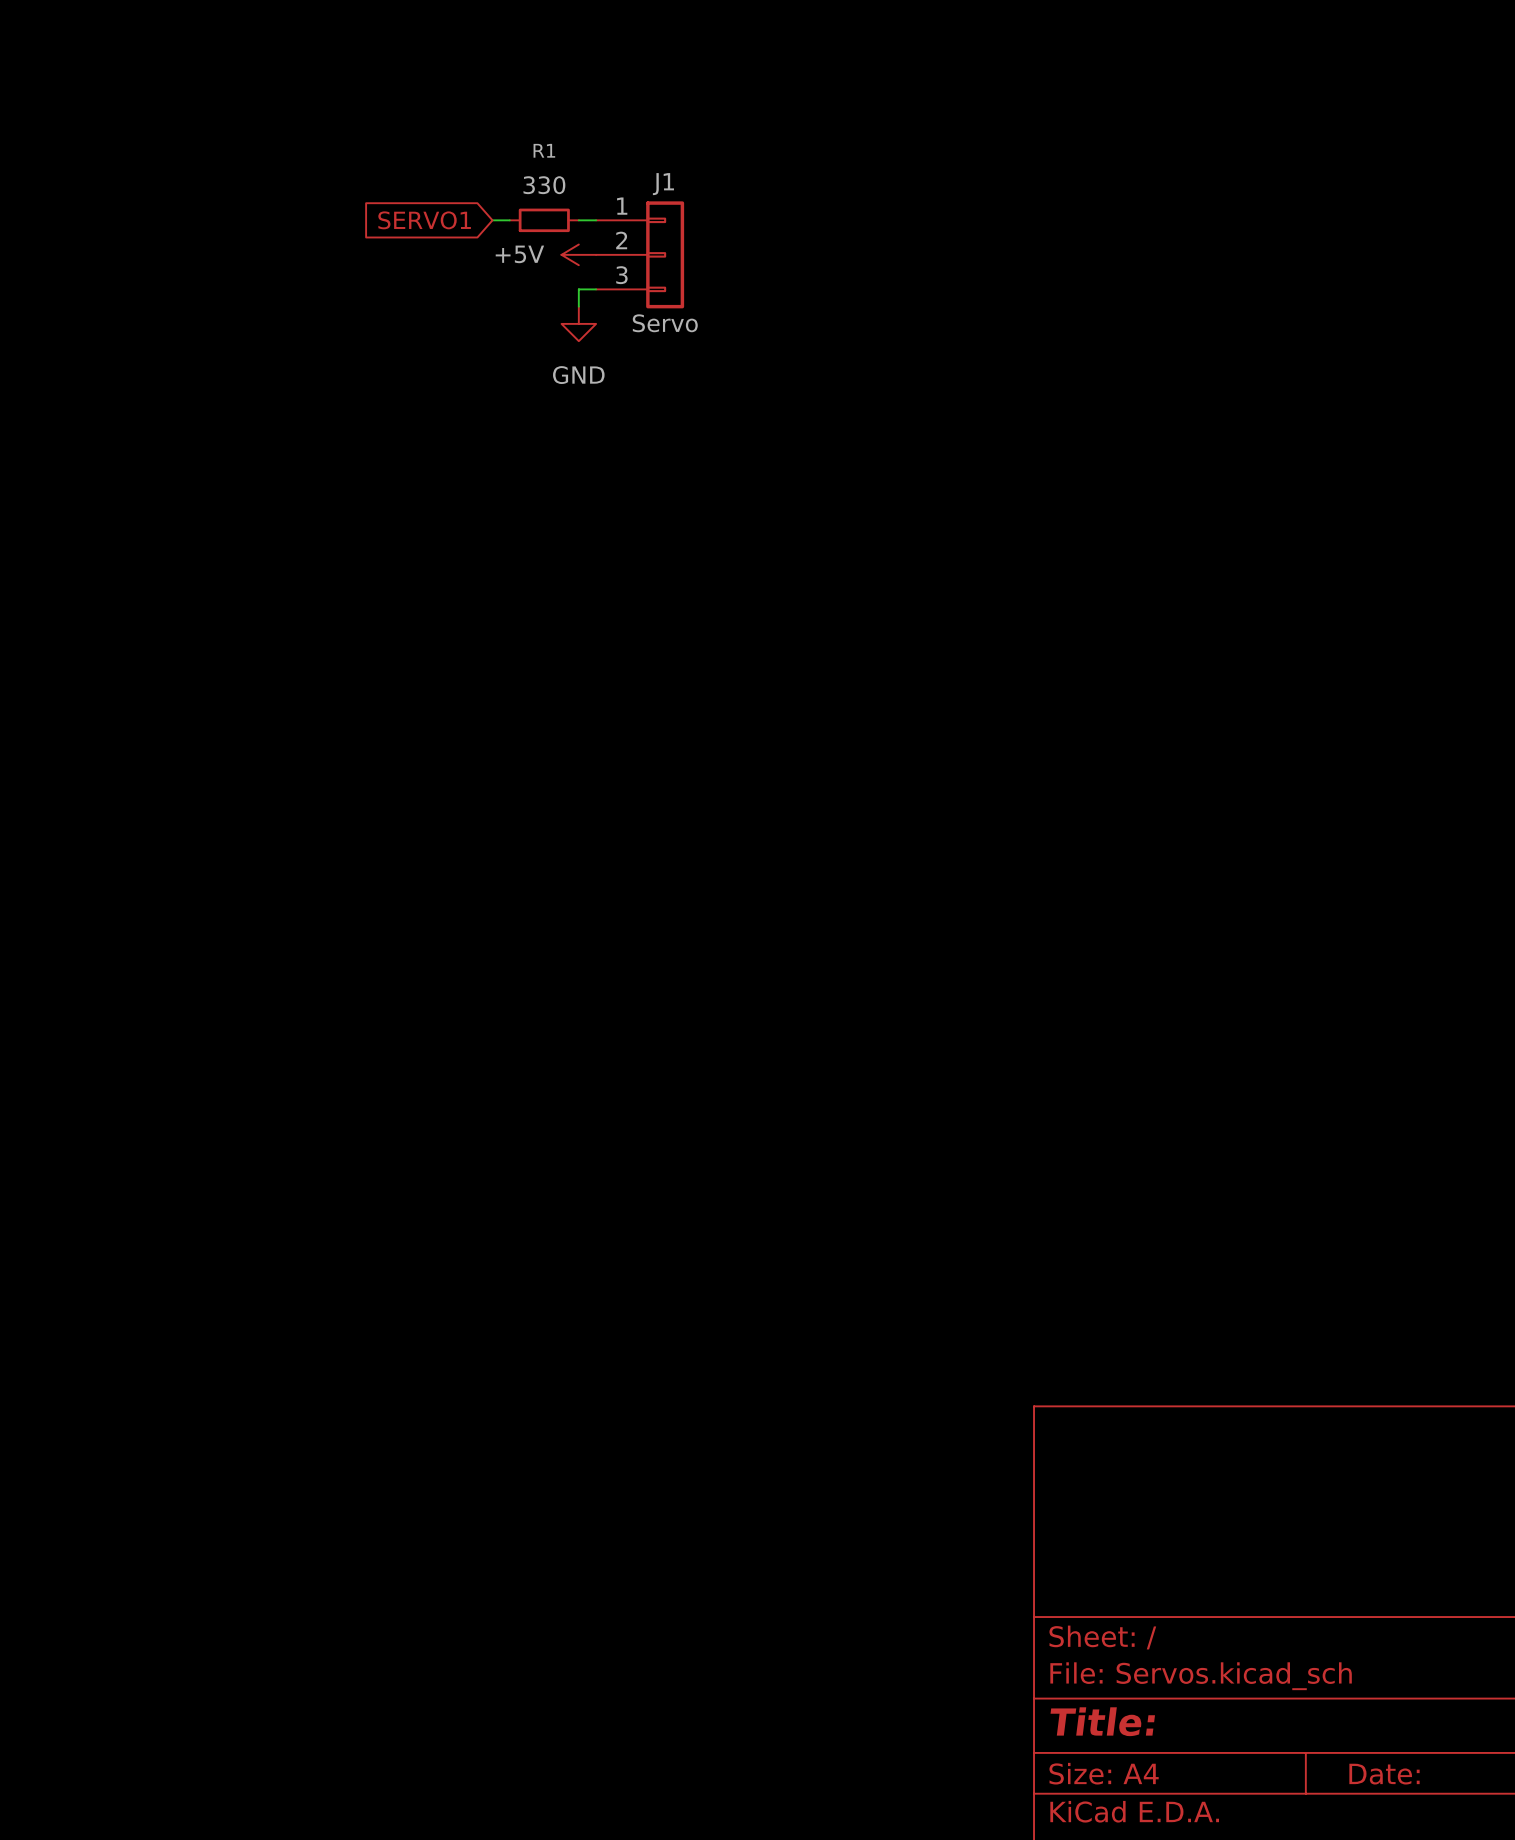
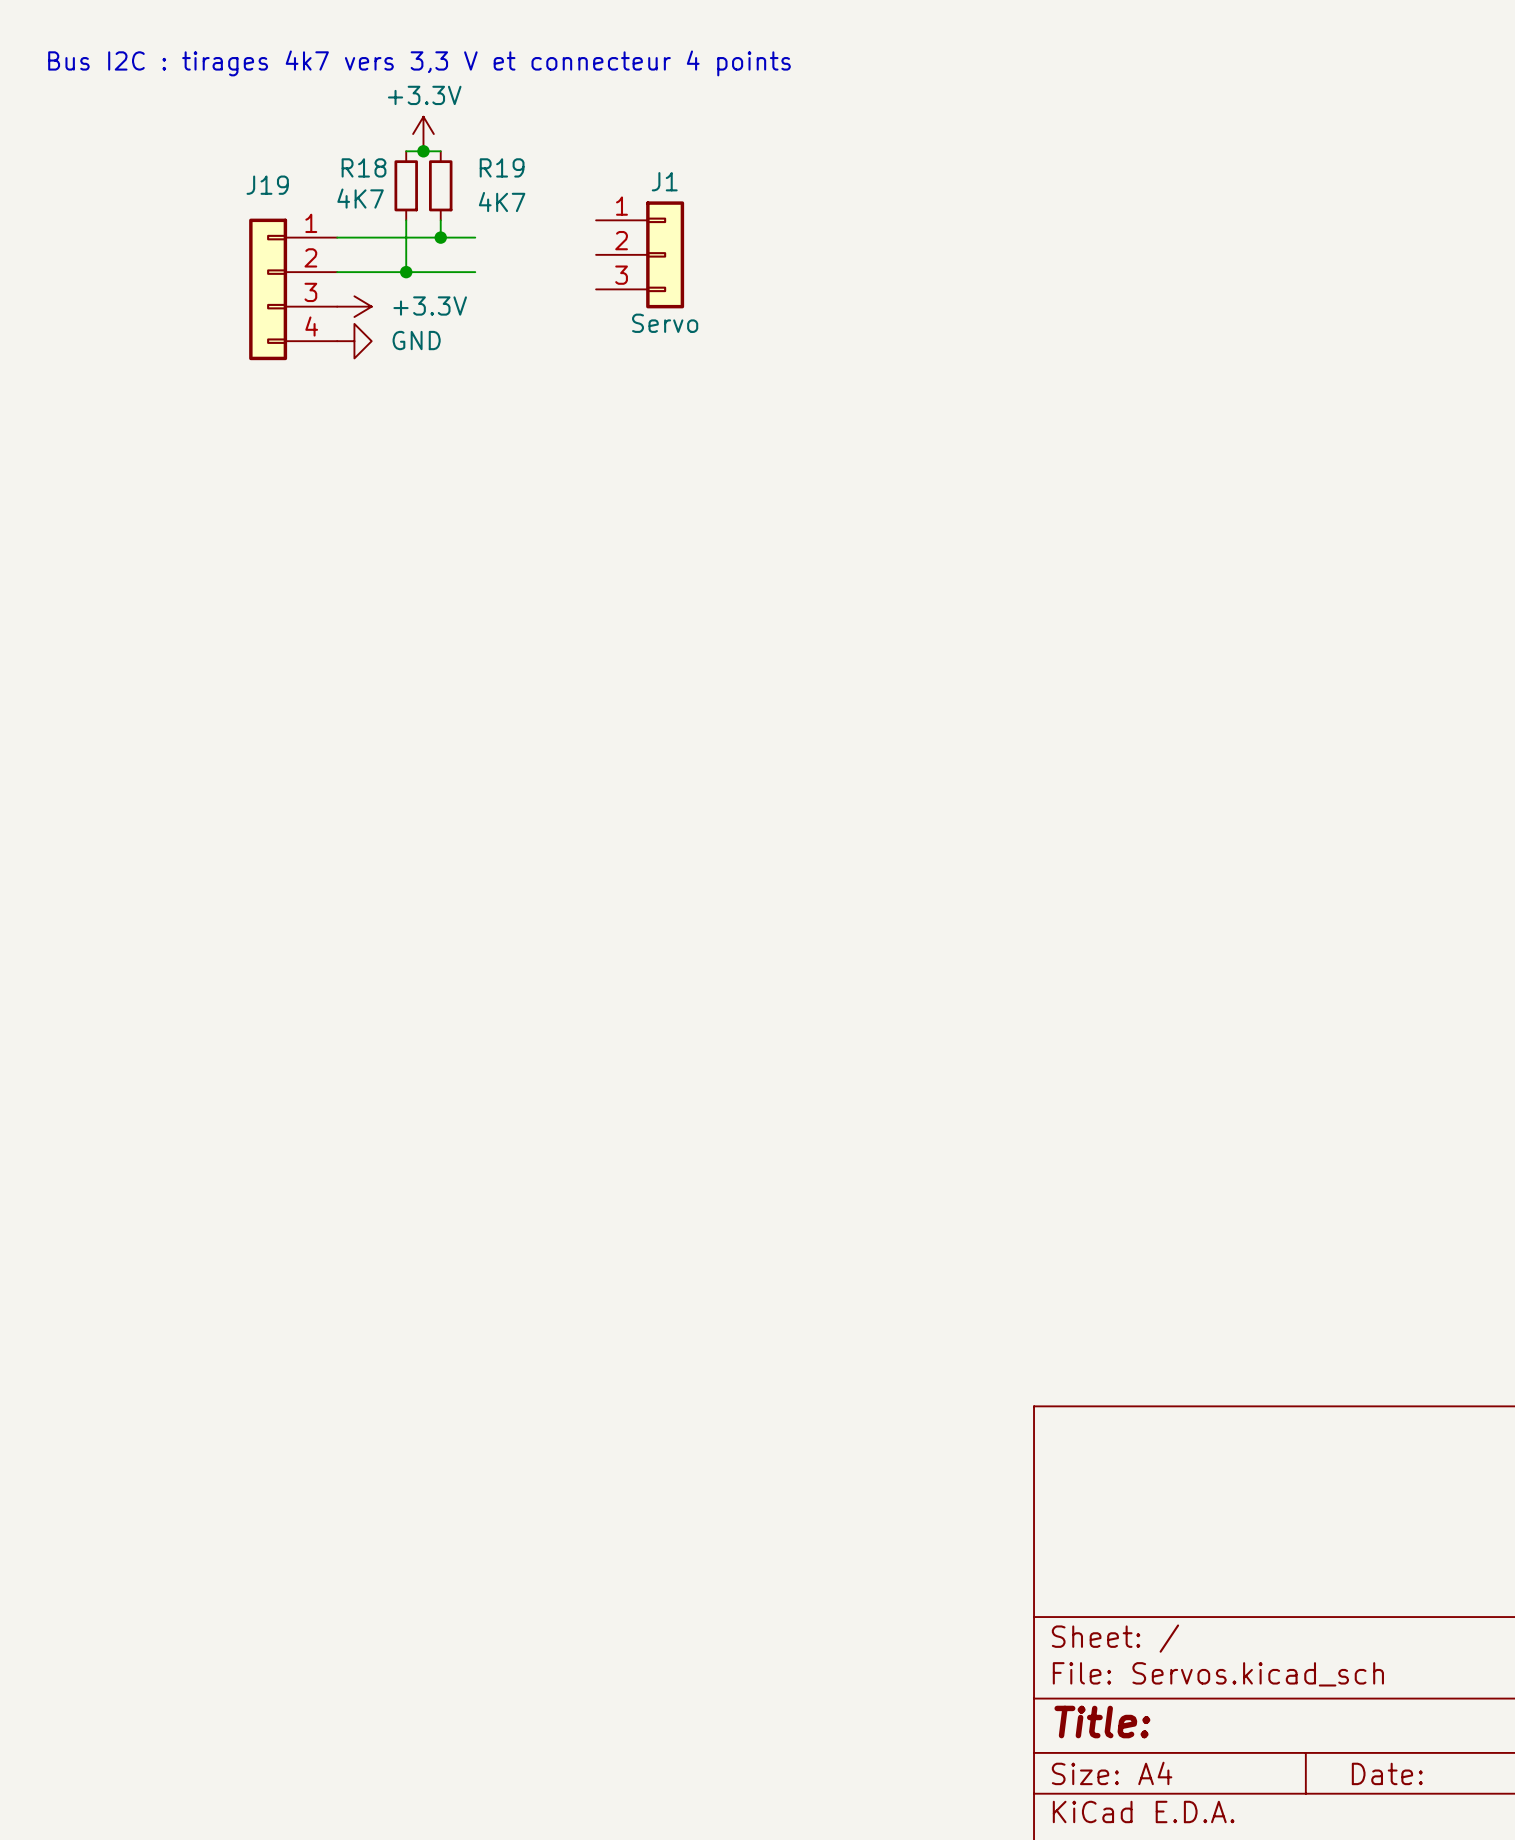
text: none -> Bus I2C : tirages 4k7 vers 3,3 V et connecteur 4 points (419, 63)
power symbol: none -> +3.3V (423, 134)
wire: none -> (406, 151) (440, 151)
junction: none -> (423, 151)
R18: none -> 4K7 (406, 185)
R19: none -> 4K7 (440, 185)
wire: none -> (406, 220) (406, 272)
global label: SERVO1 (424, 220) -> none
wire: none -> (440, 220) (440, 237)
wire: (492, 220) (509, 220) -> none
R1: 330 (544, 220) -> none
wire: (578, 220) (596, 220) -> none
wire: none -> (337, 237) (475, 237)
junction: none -> (440, 237)
power symbol: +5V (578, 254) -> none
wire: none -> (337, 272) (475, 272)
junction: none -> (406, 272)
J19: none -> (293, 289)
wire: (596, 289) (578, 289) (578, 306) -> none
power symbol: none -> +3.3V (354, 306)
power symbol rotation: 0° (578, 323) -> 90° counterclockwise (354, 341)
power symbol position: GND (578, 323) -> GND (354, 341)

